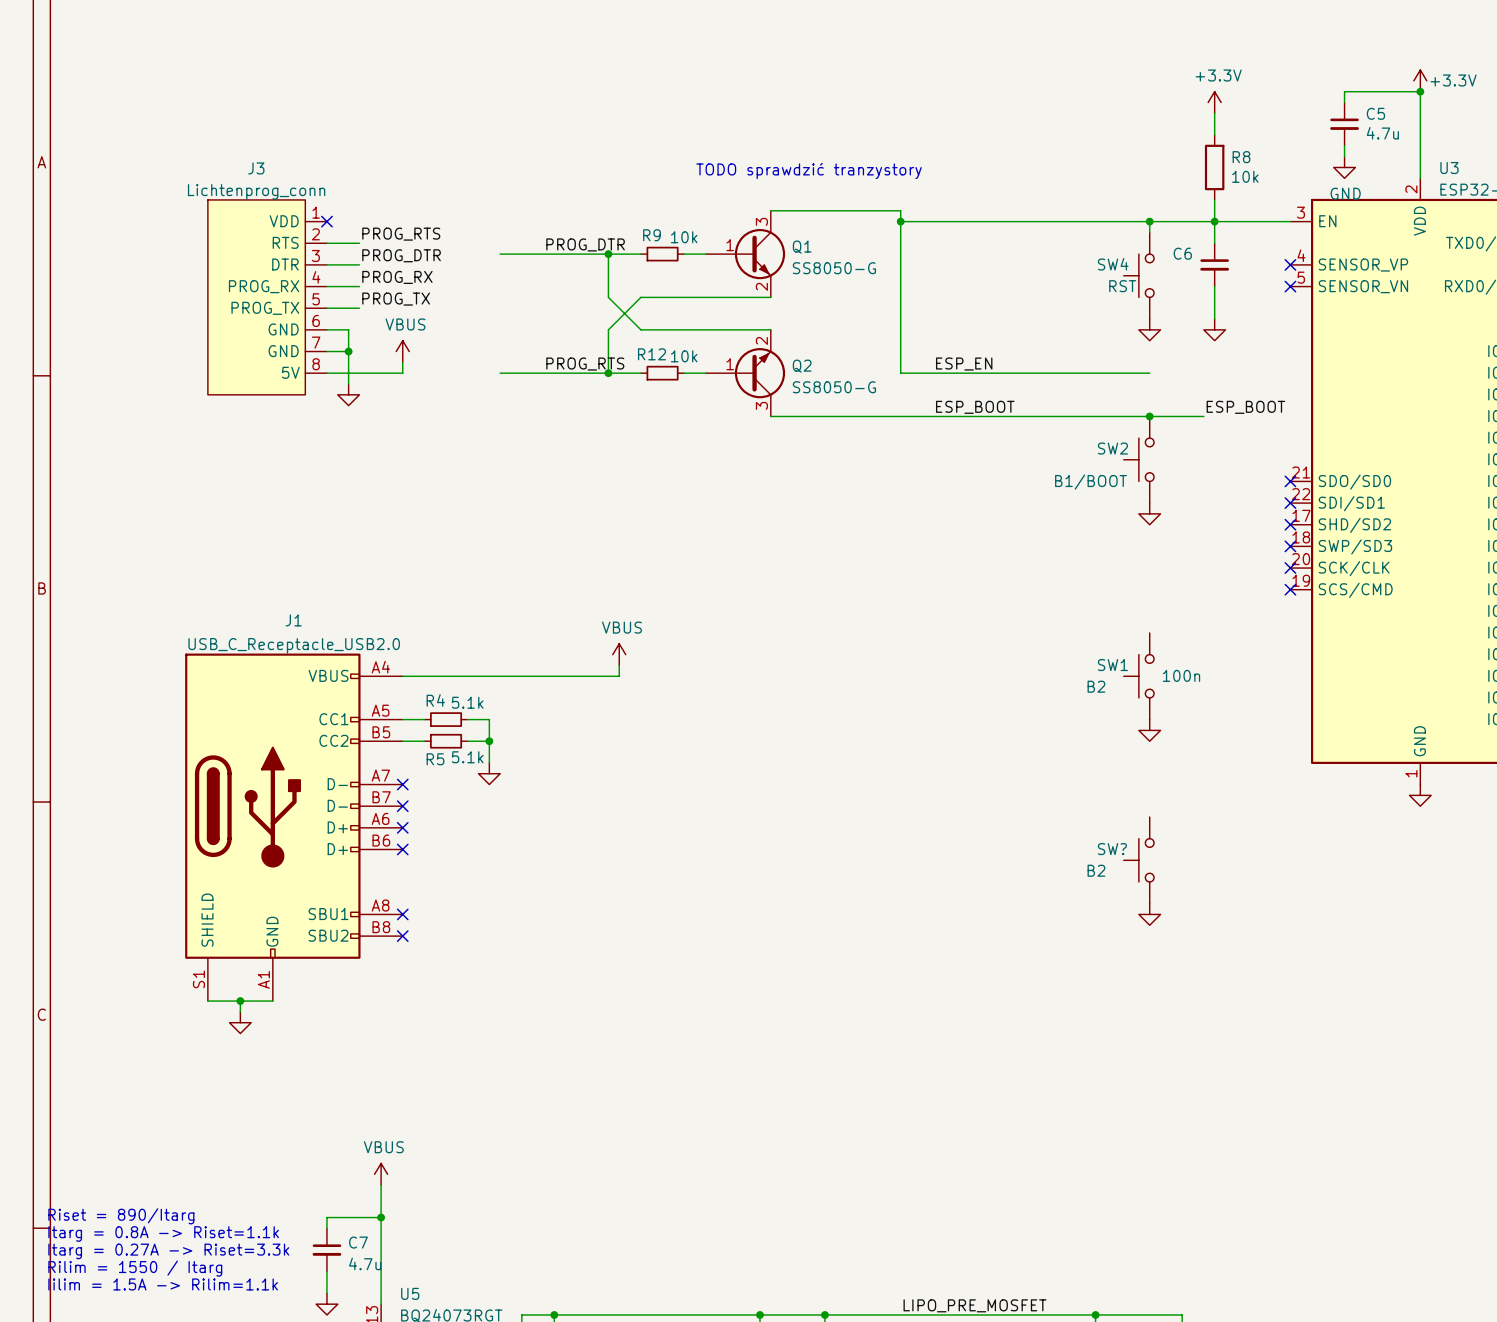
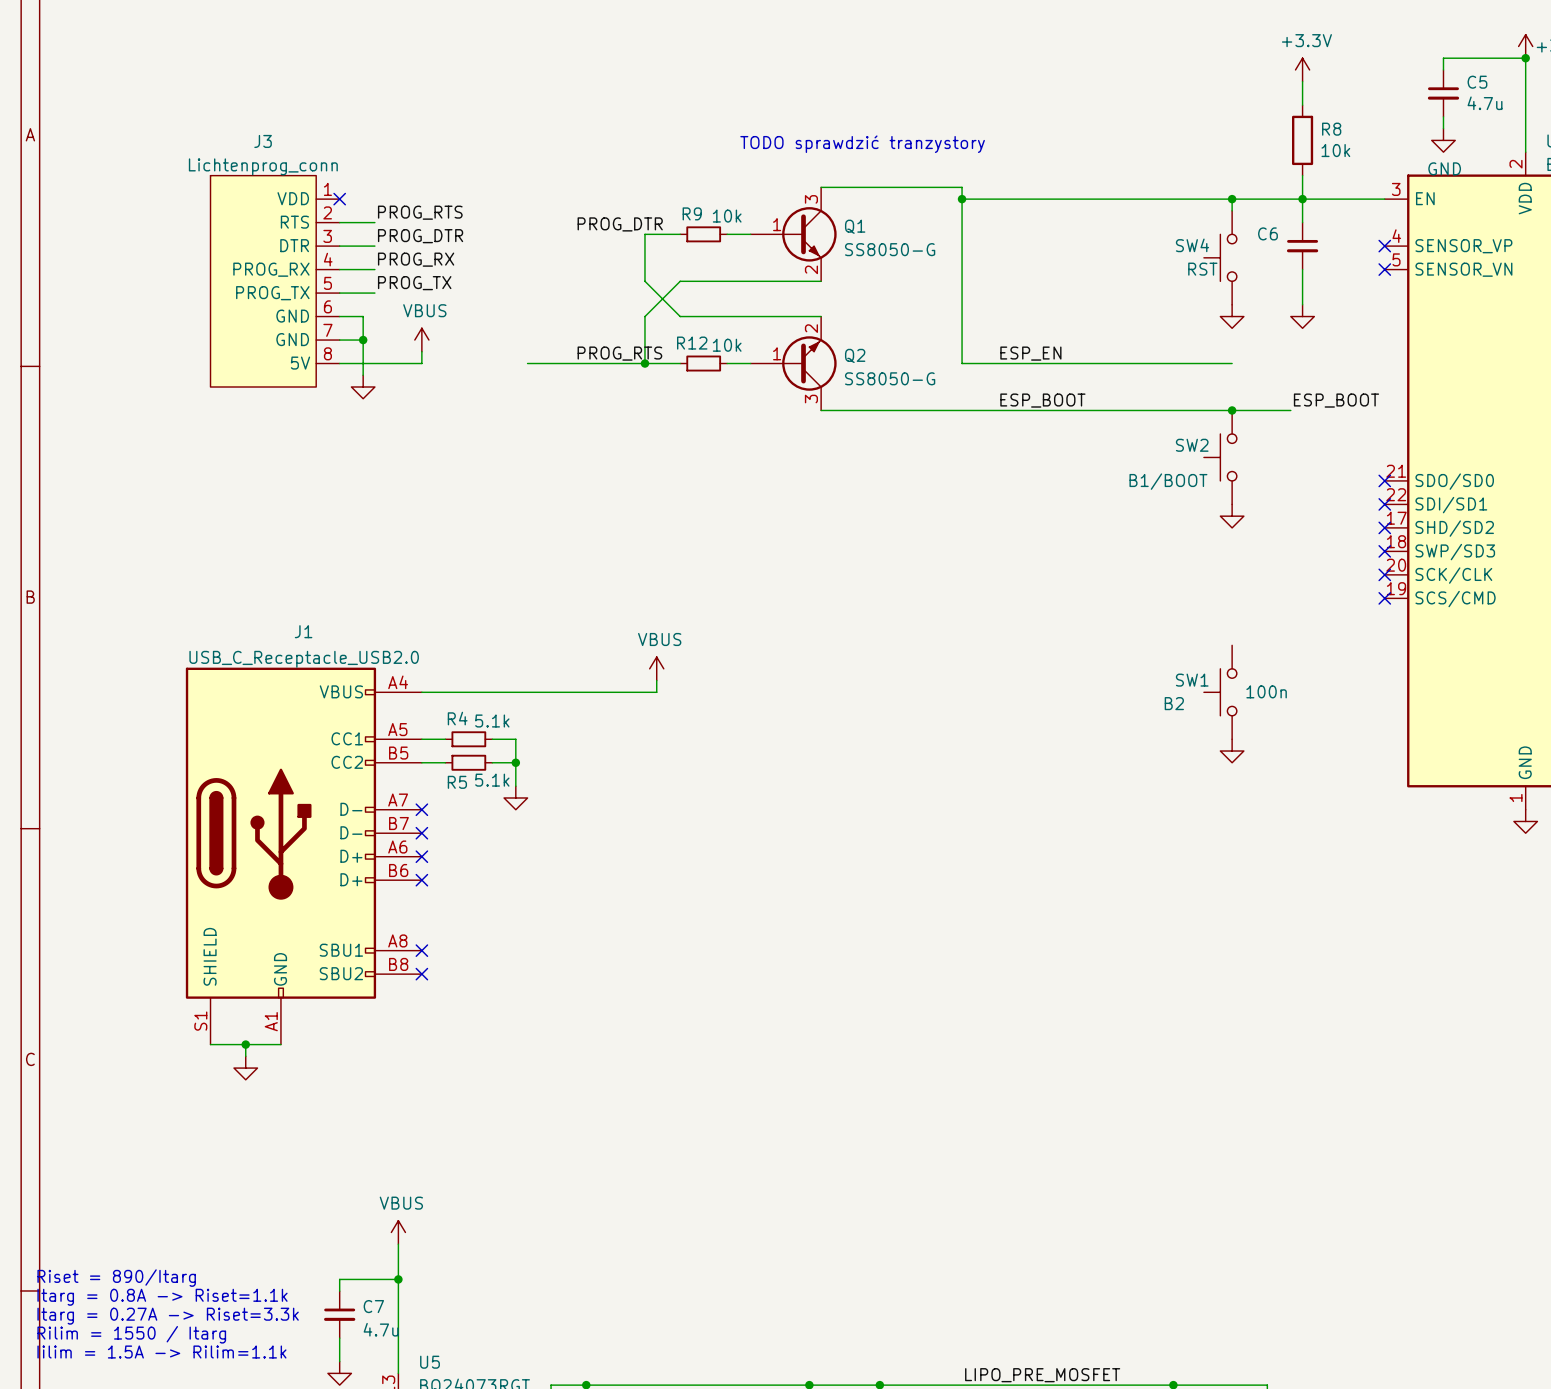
wire: (500, 254) (608, 254) -> none
junction: (608, 254) -> none
SW?: B2 (1138, 860) -> none
power symbol: (1149, 914) -> none

